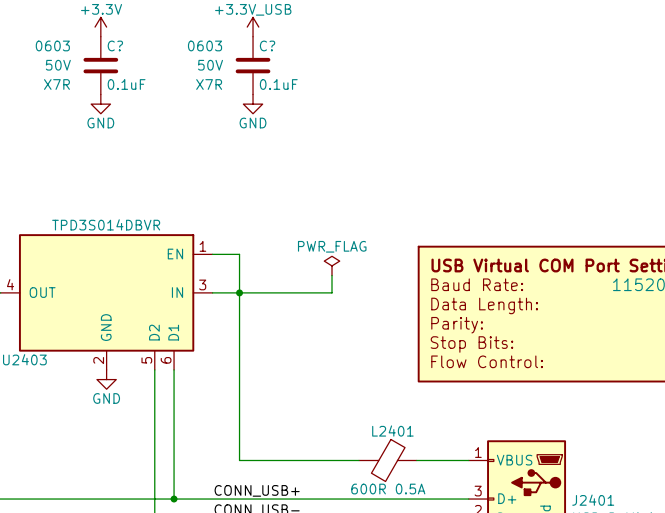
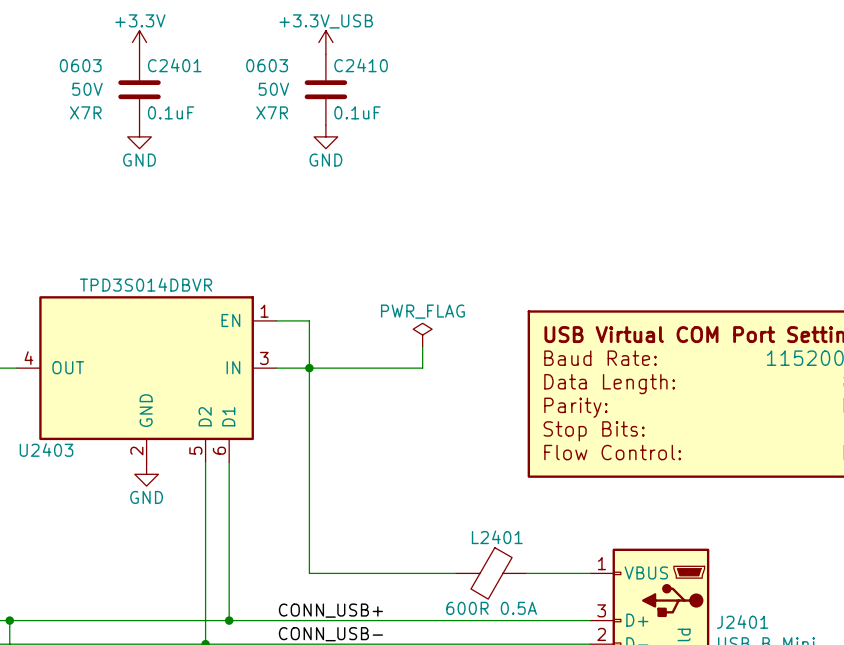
C? name: C? (115, 45) -> C2401 (174, 65)
C? name: C? (267, 45) -> C2410 (361, 65)

